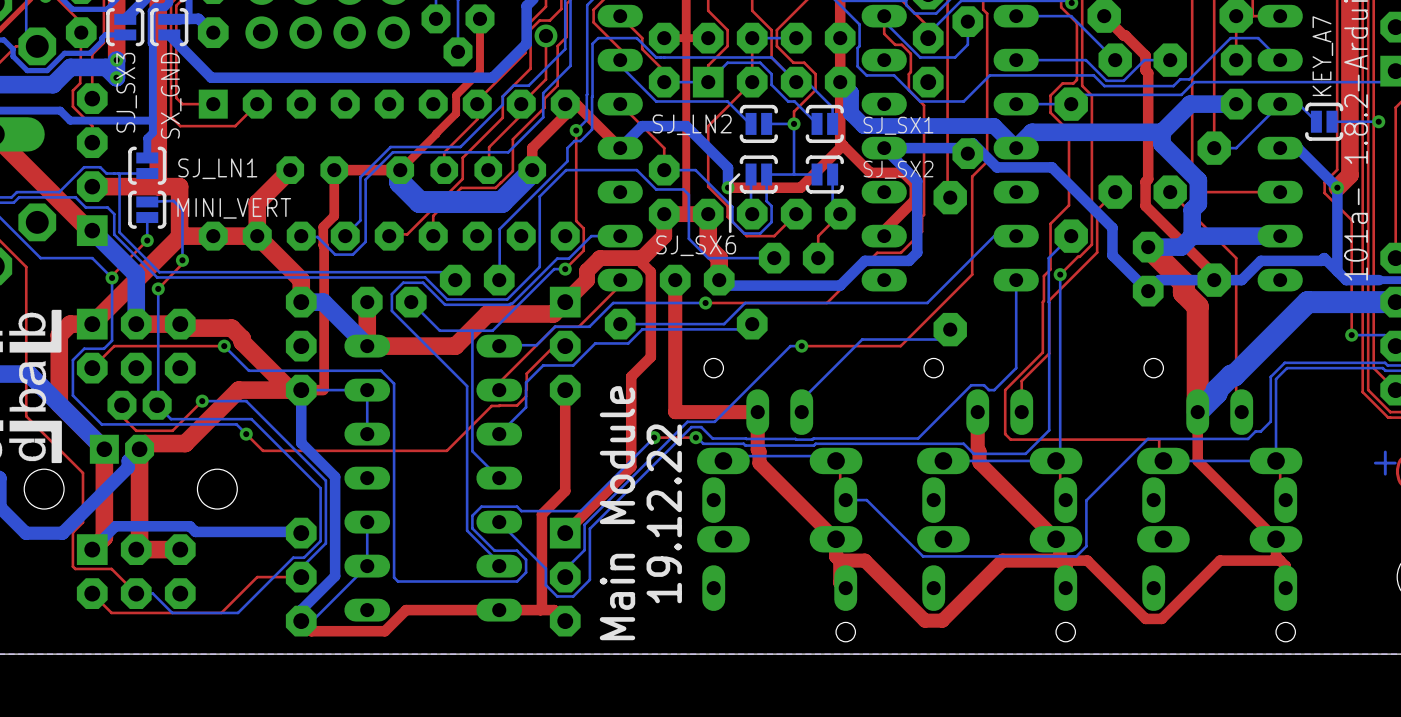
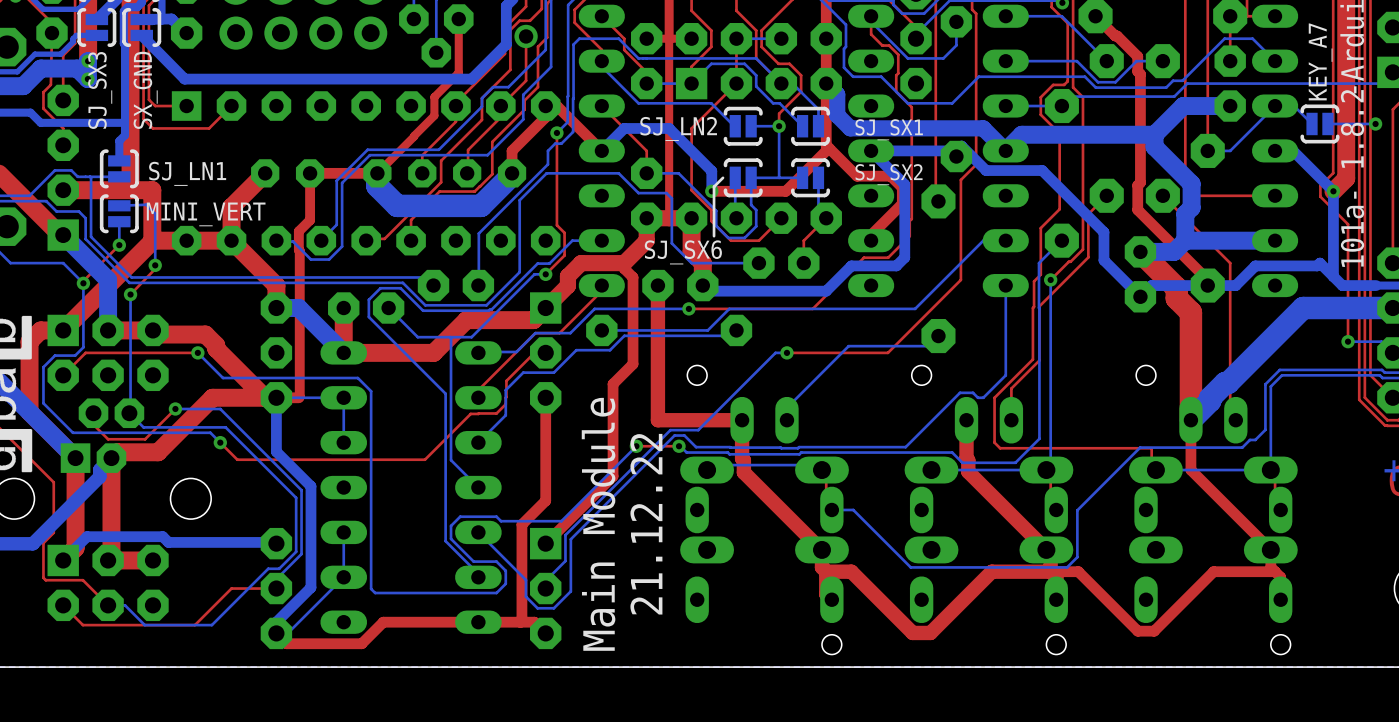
text: 19.12.22 (664, 513) -> 21.12.22 (646, 524)

